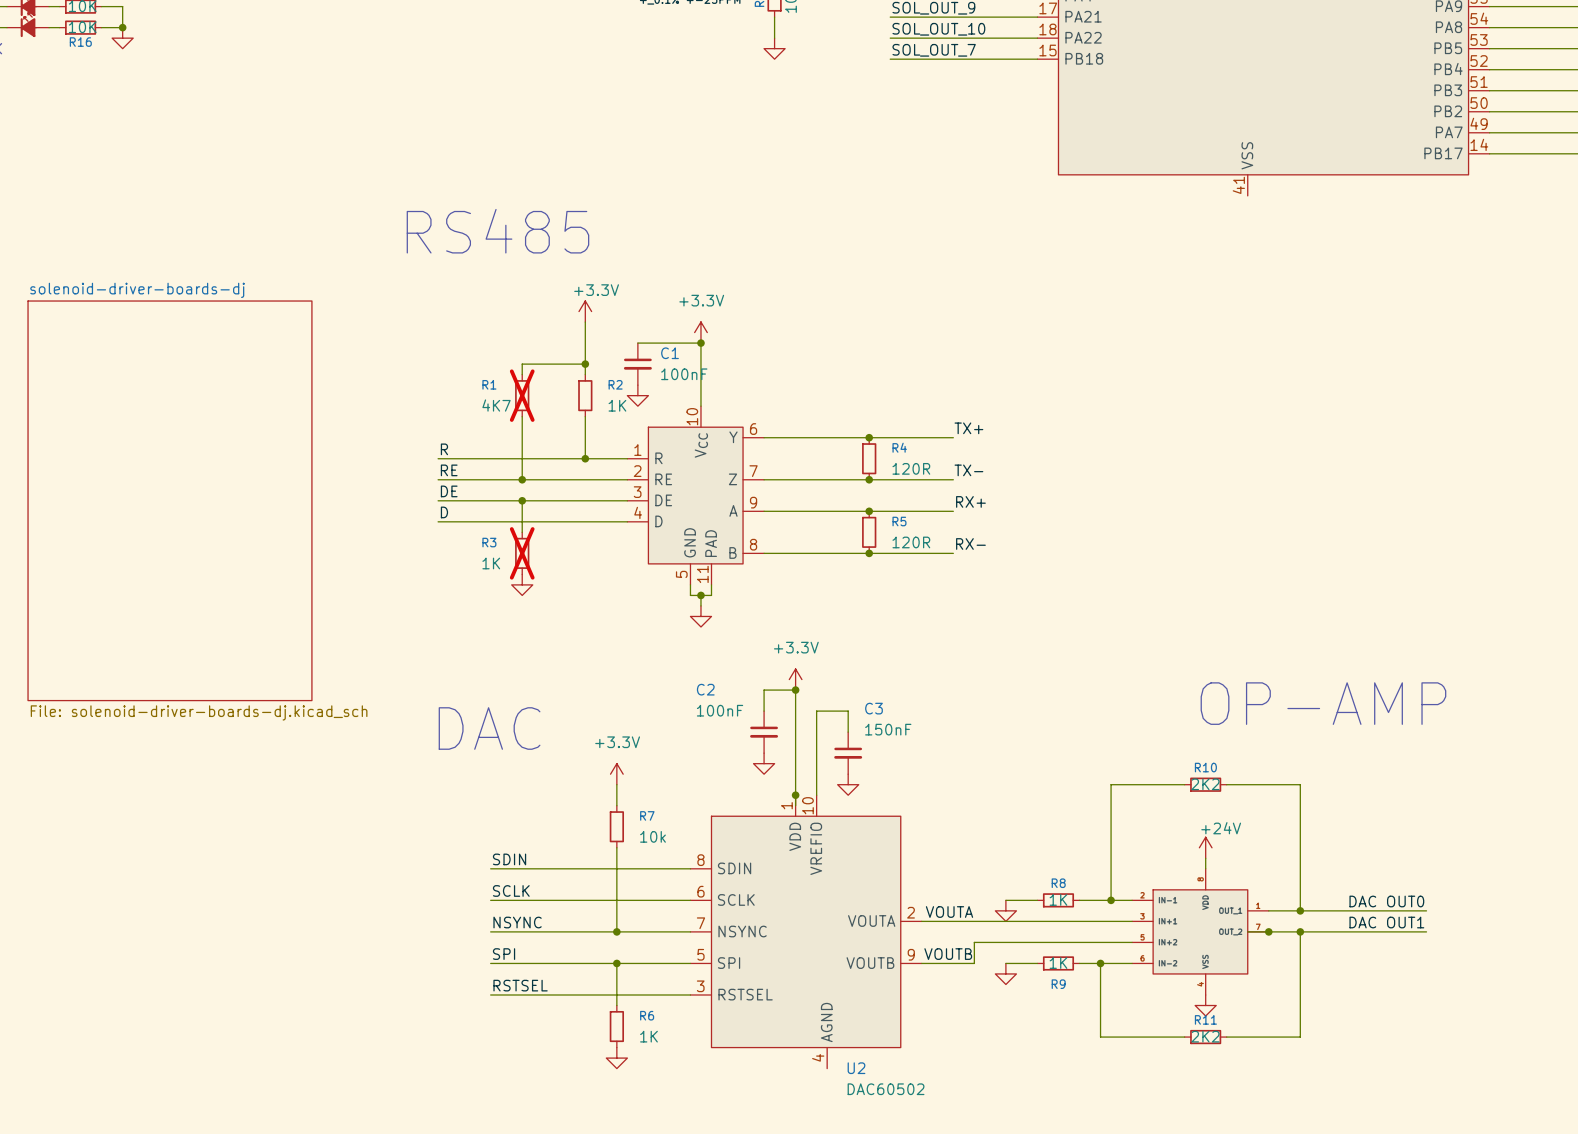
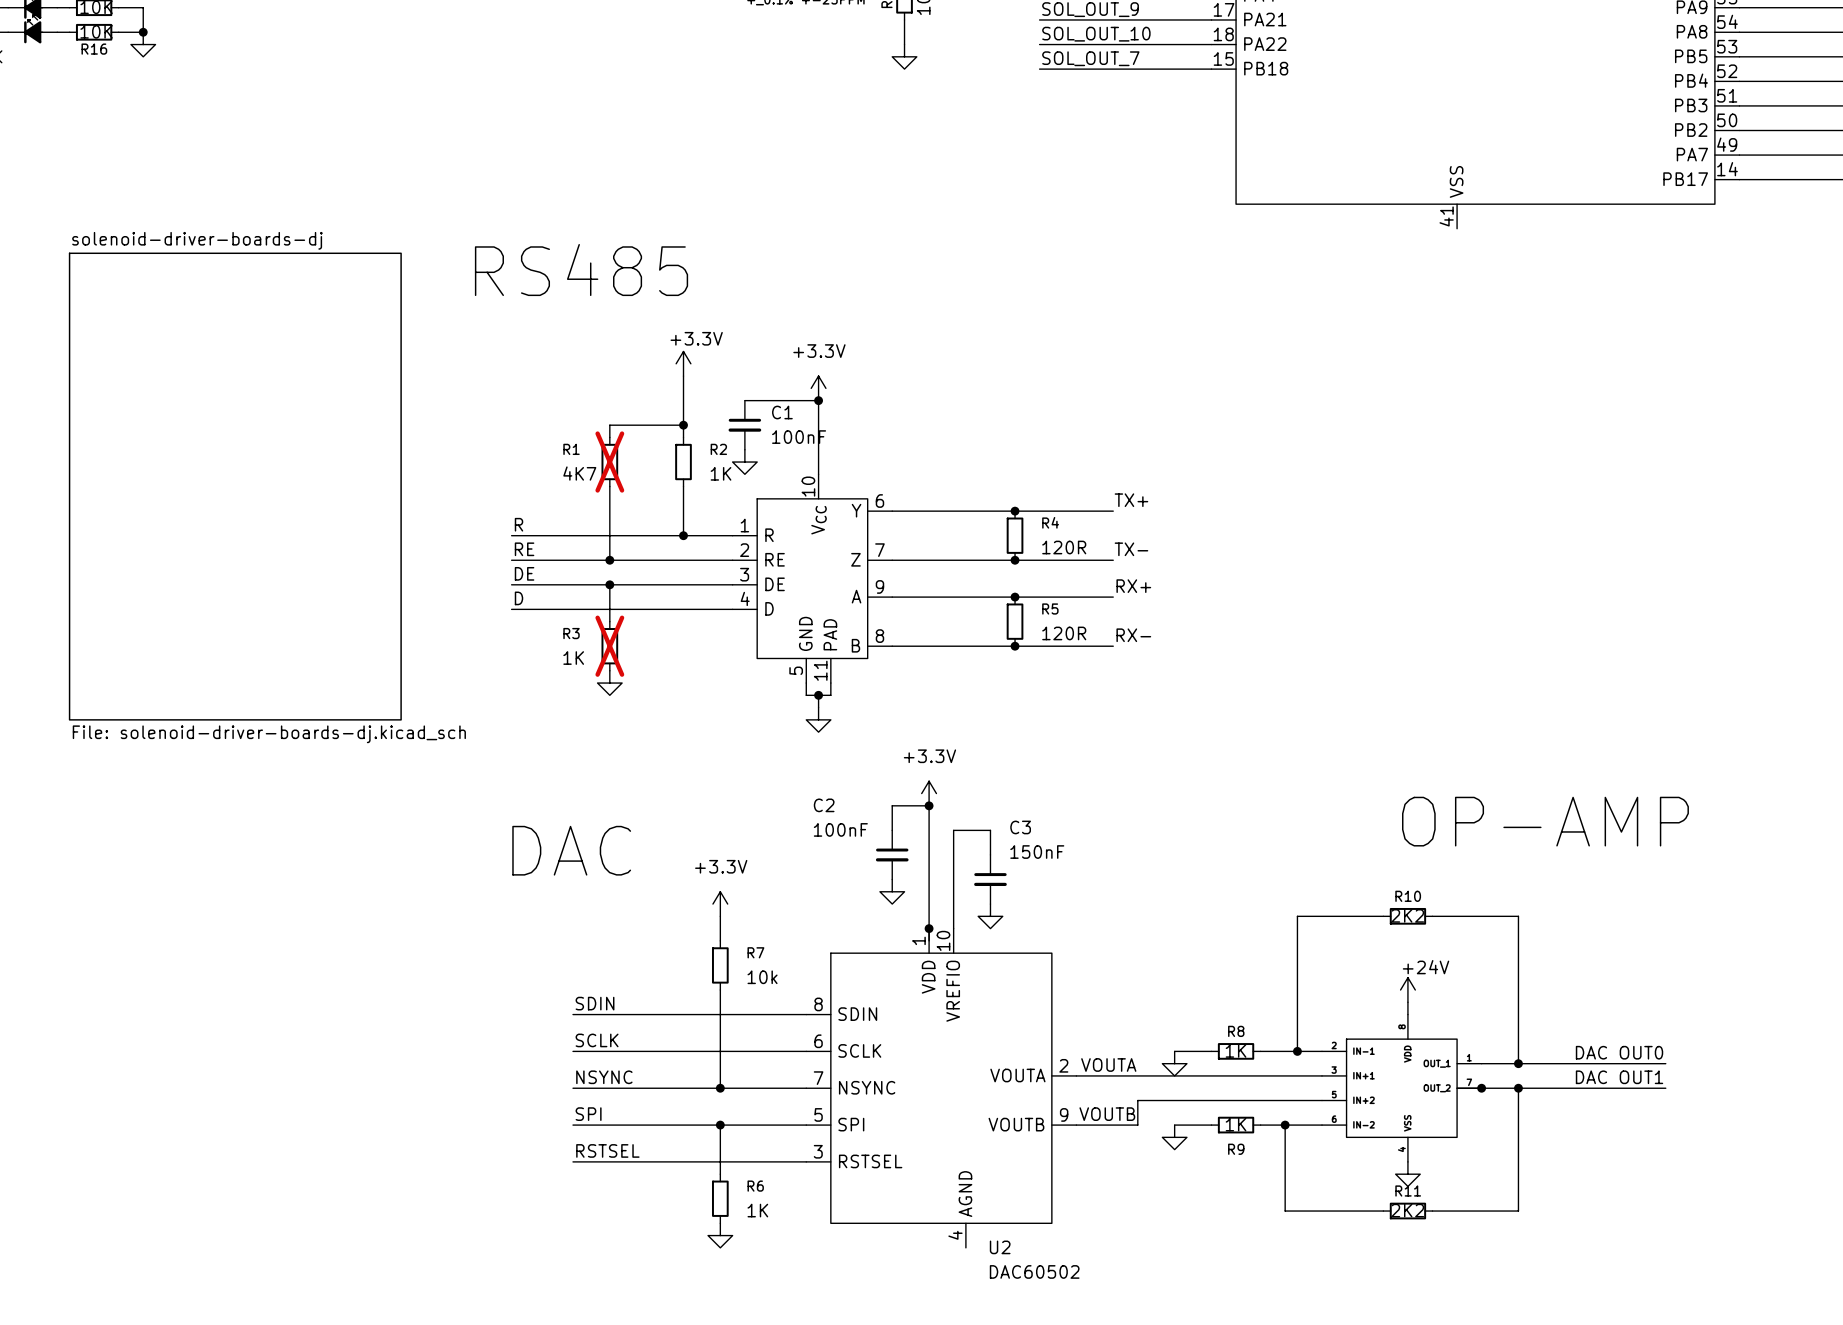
sheet solenoid-driver-boards-dj position: (169, 500) -> (235, 486)

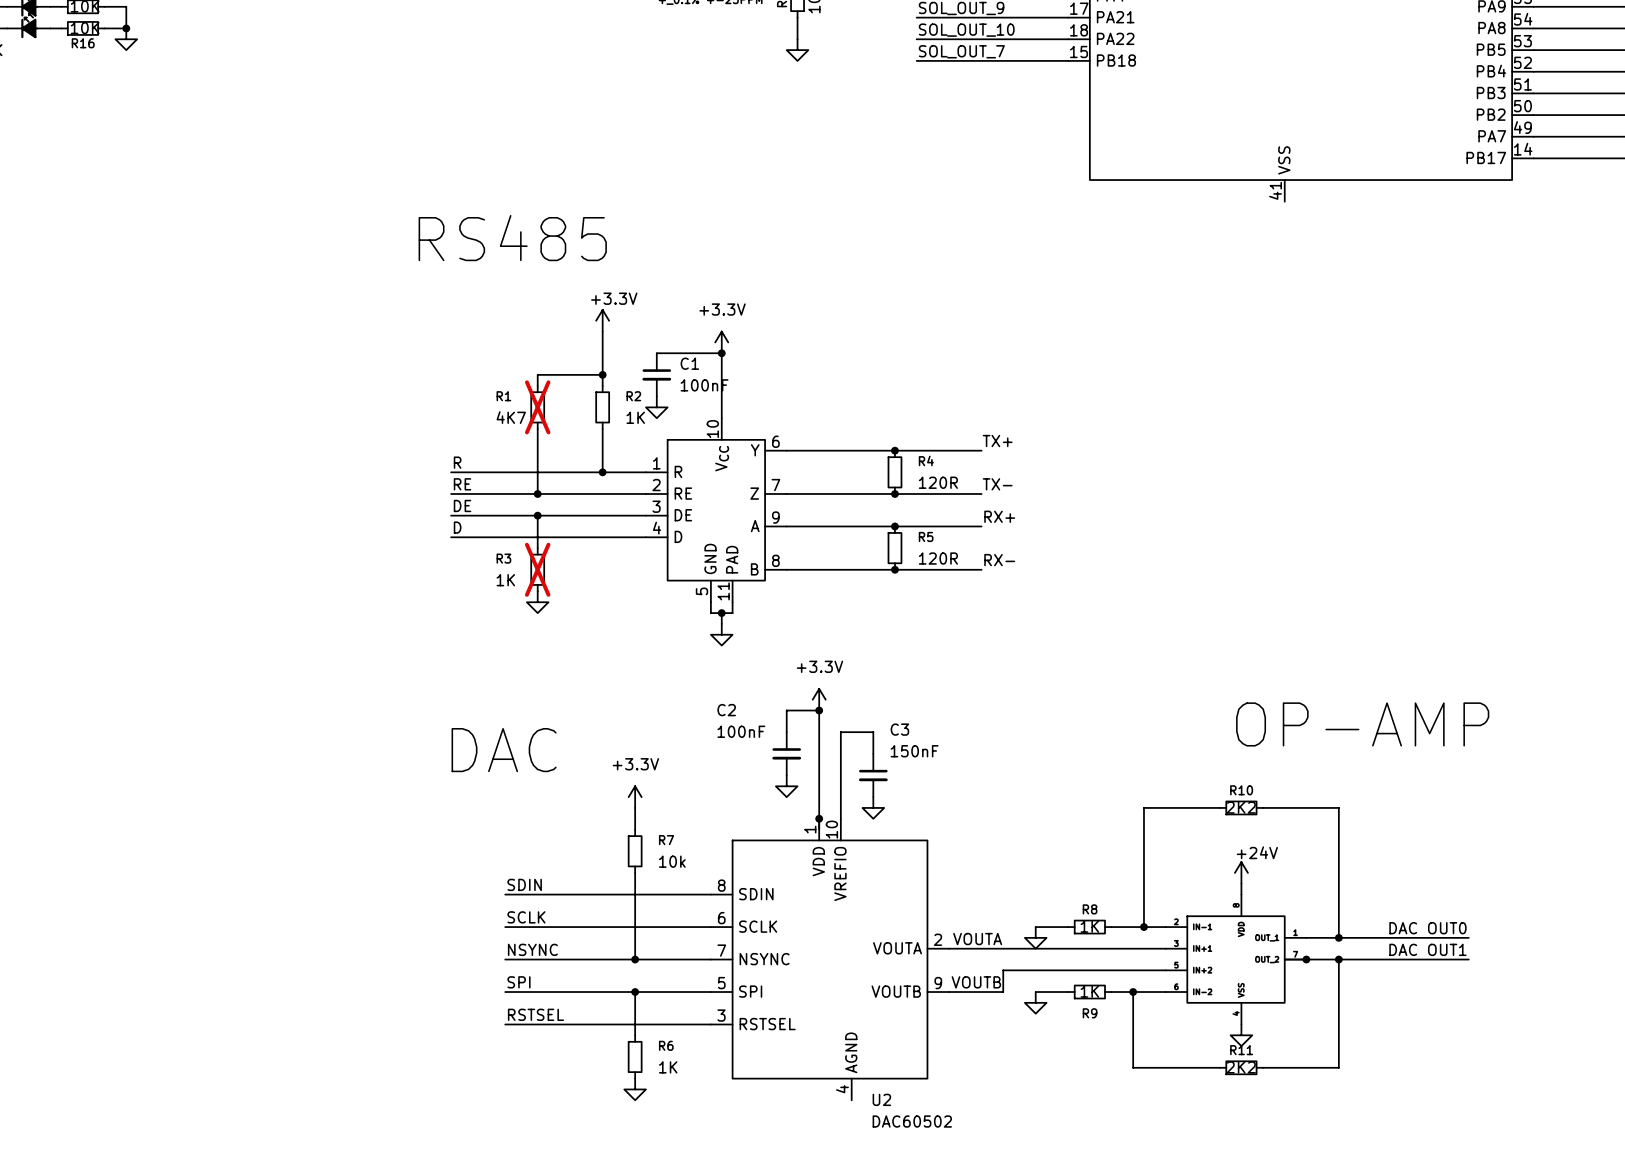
sheet solenoid-driver-boards-dj: File: solenoid-driver-boards-dj.kicad_sch (235, 486) -> none

